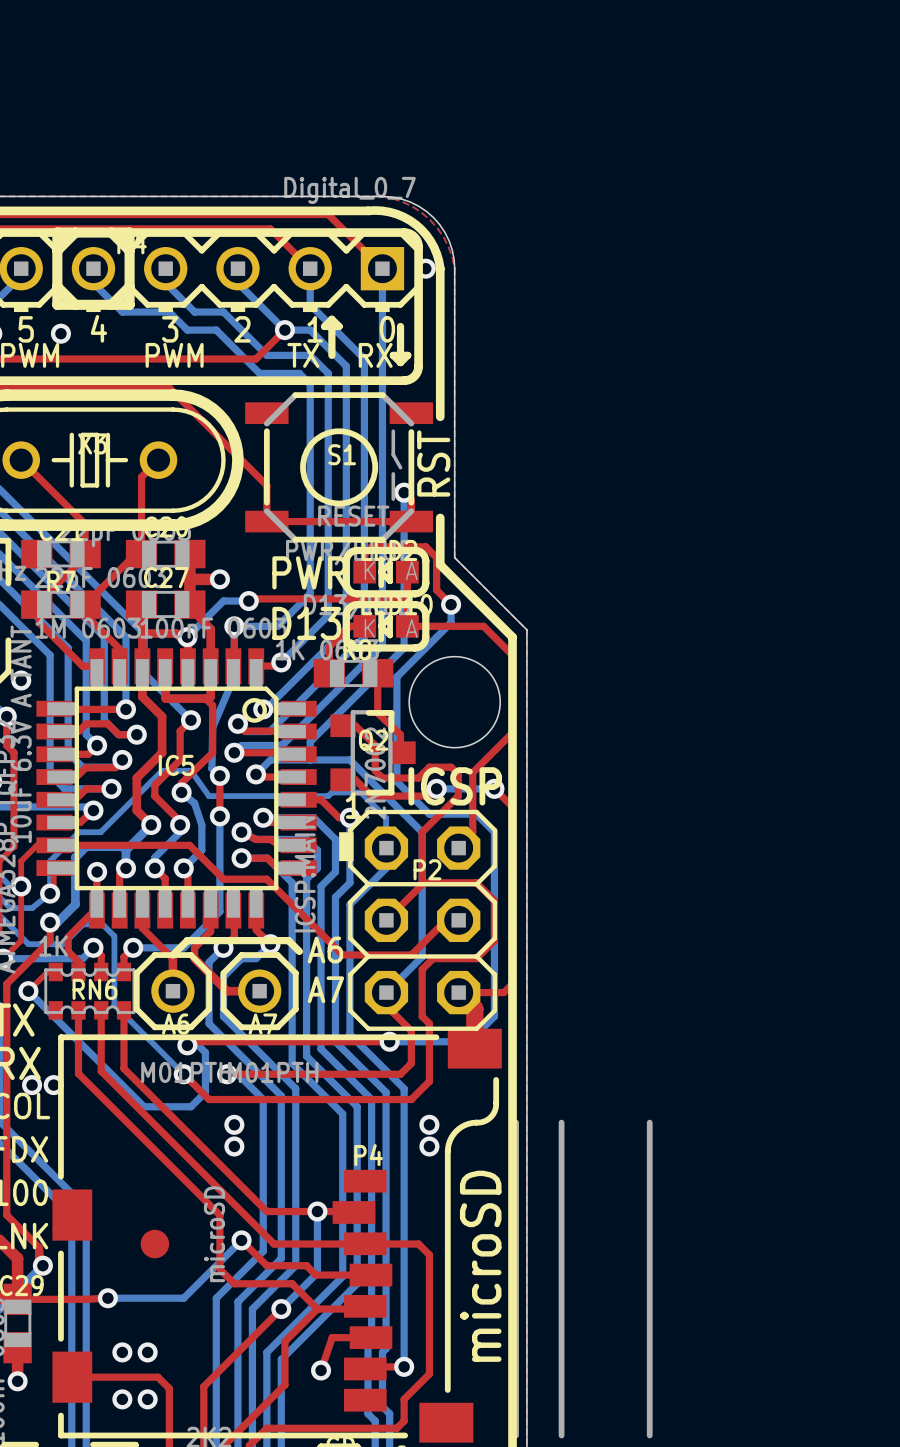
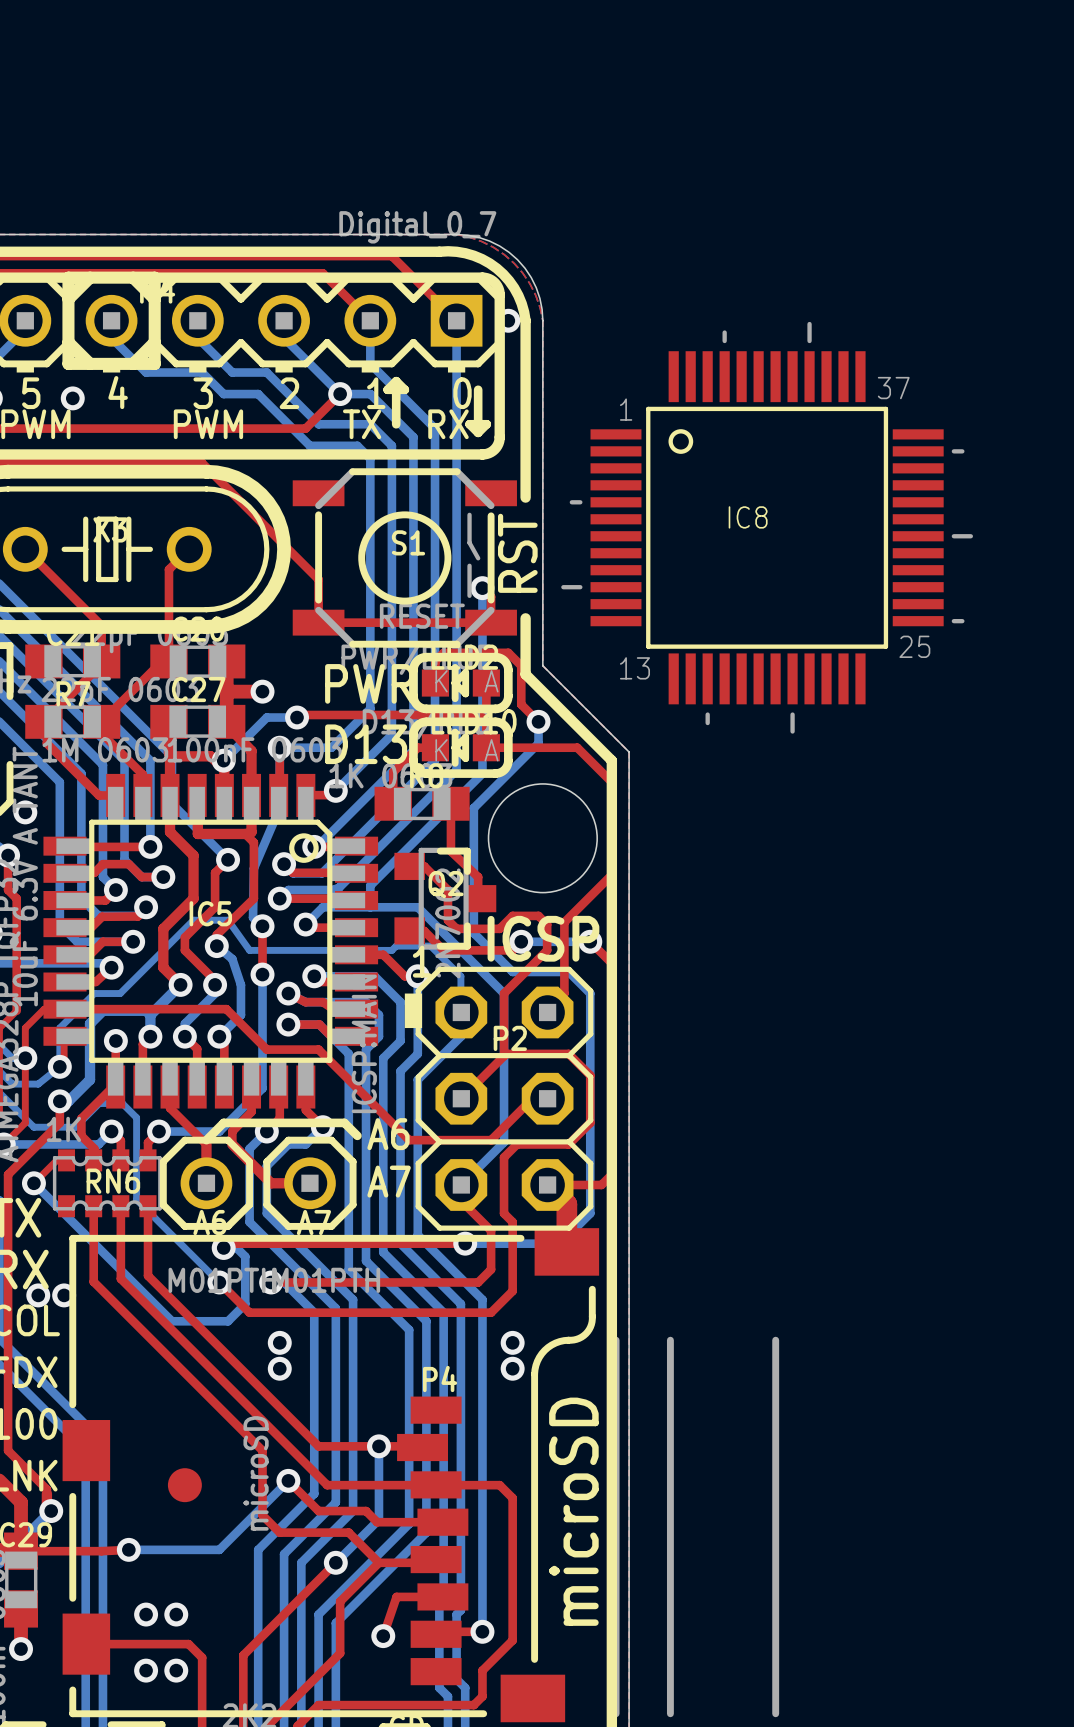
IC8: none -> (767, 527)

